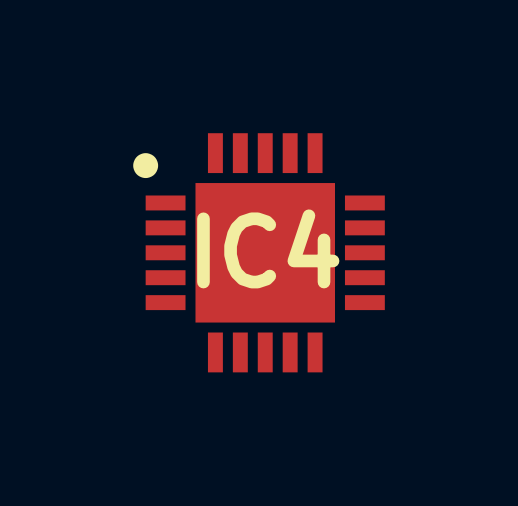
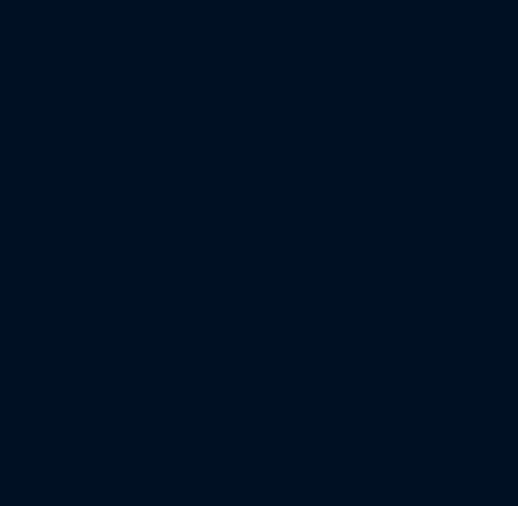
IC4: (259, 252) -> none

